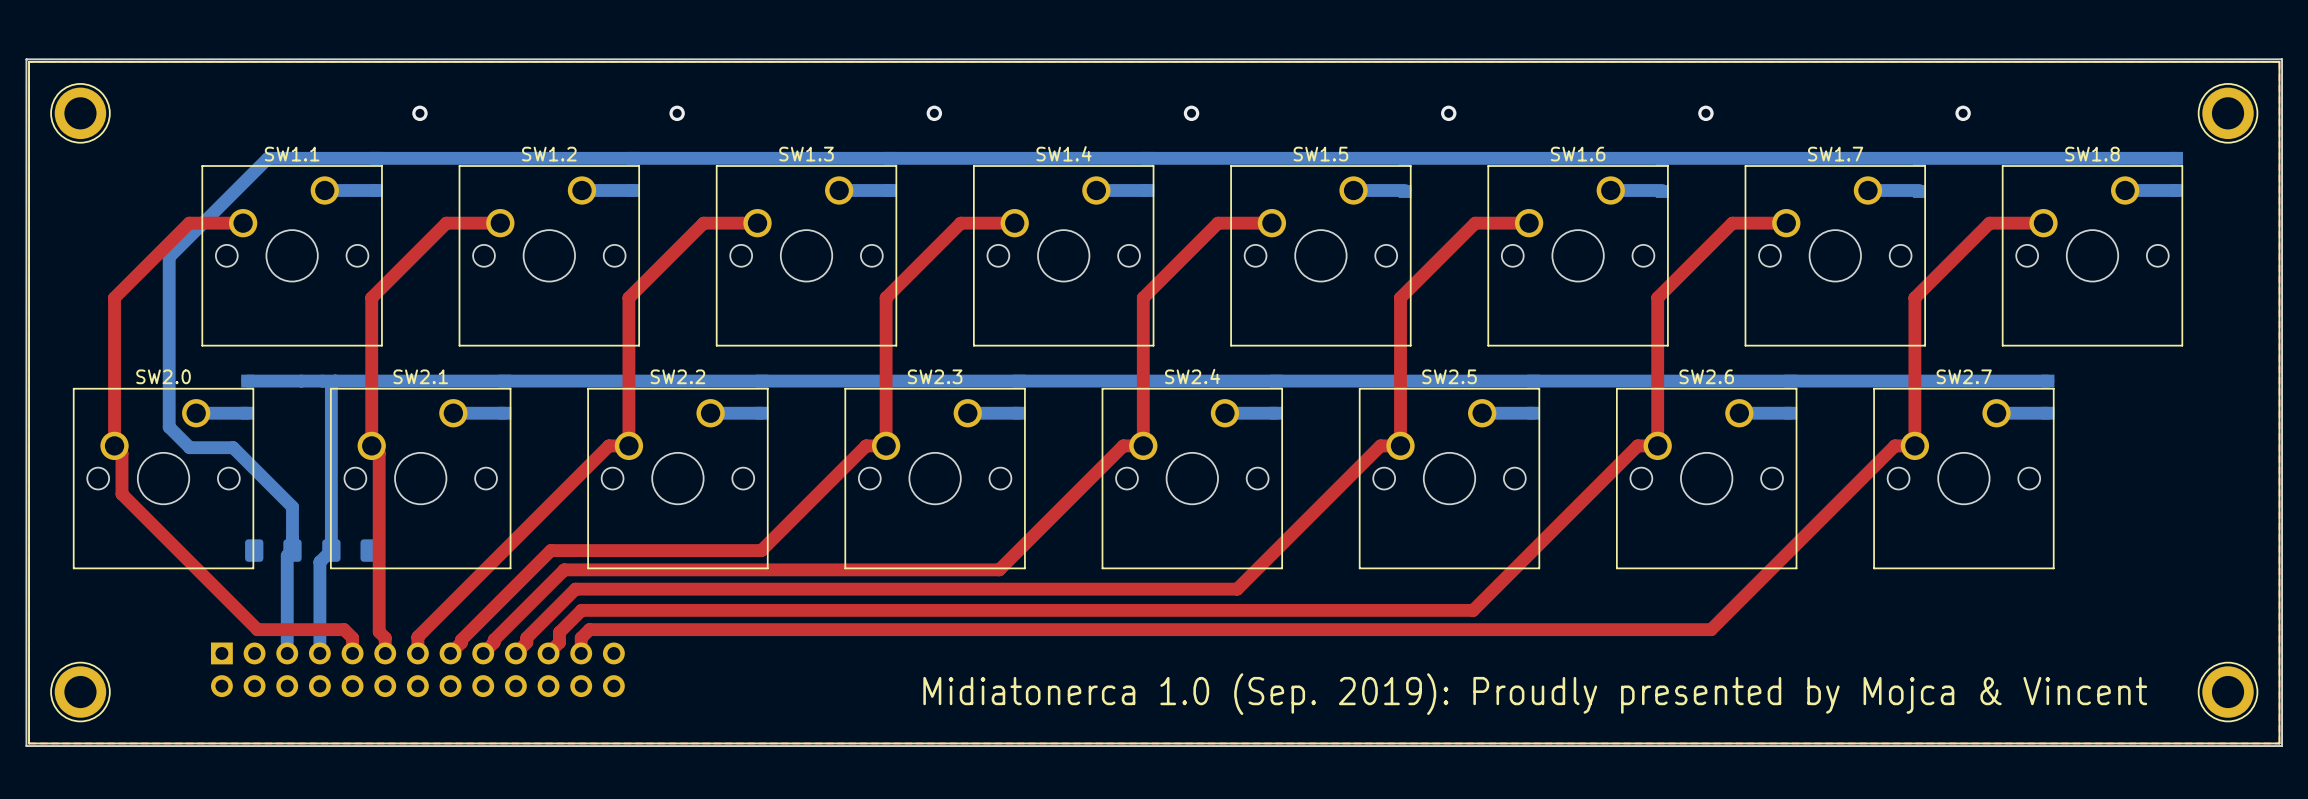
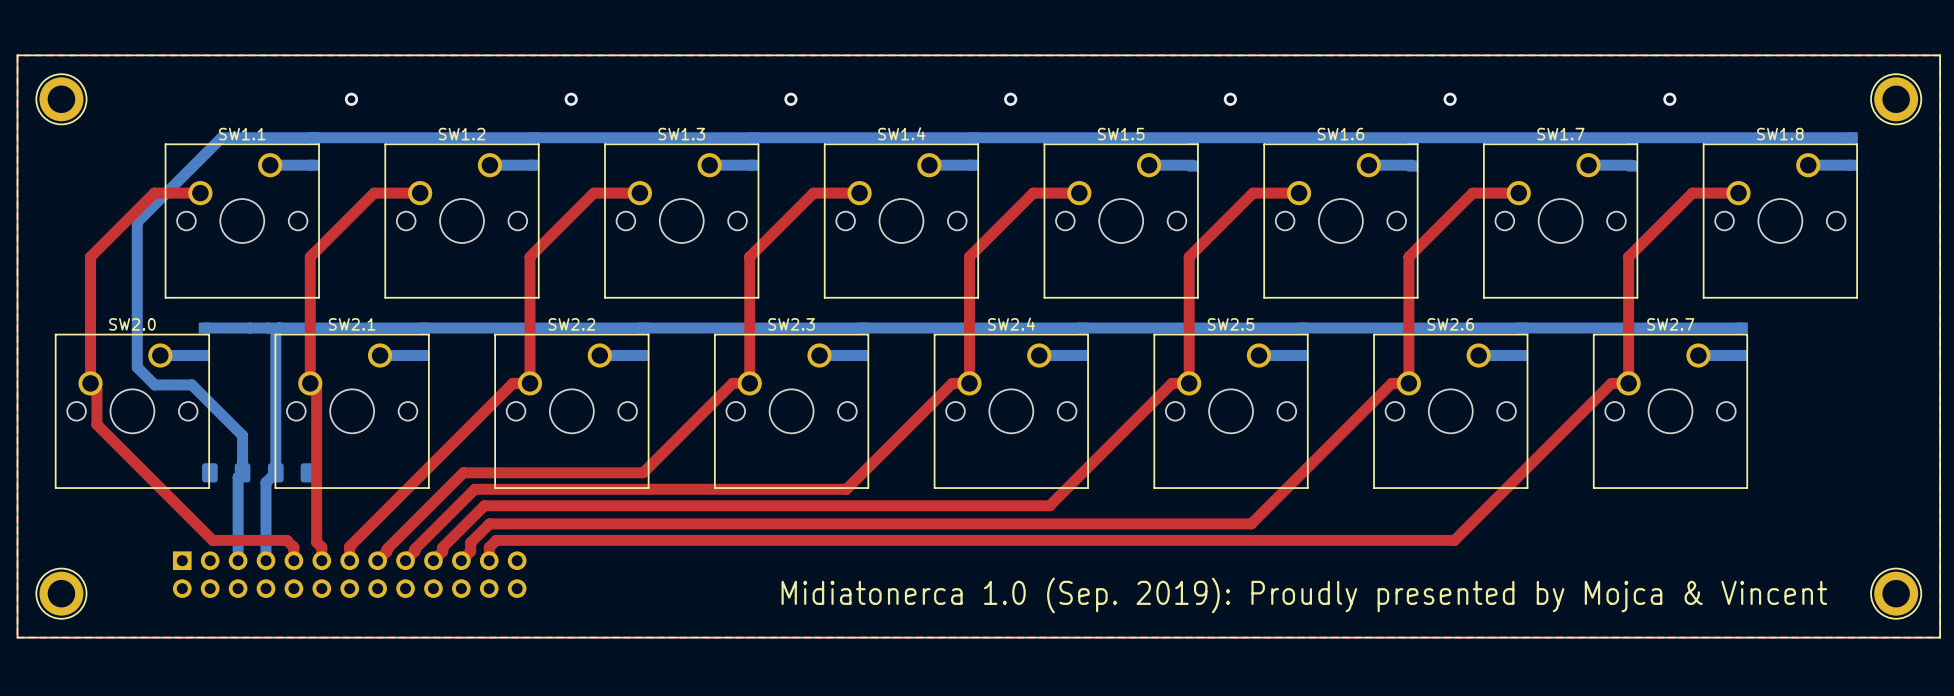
board edge: (26, 59) (2282, 59) (2282, 746) (26, 746) (26, 59) -> none

